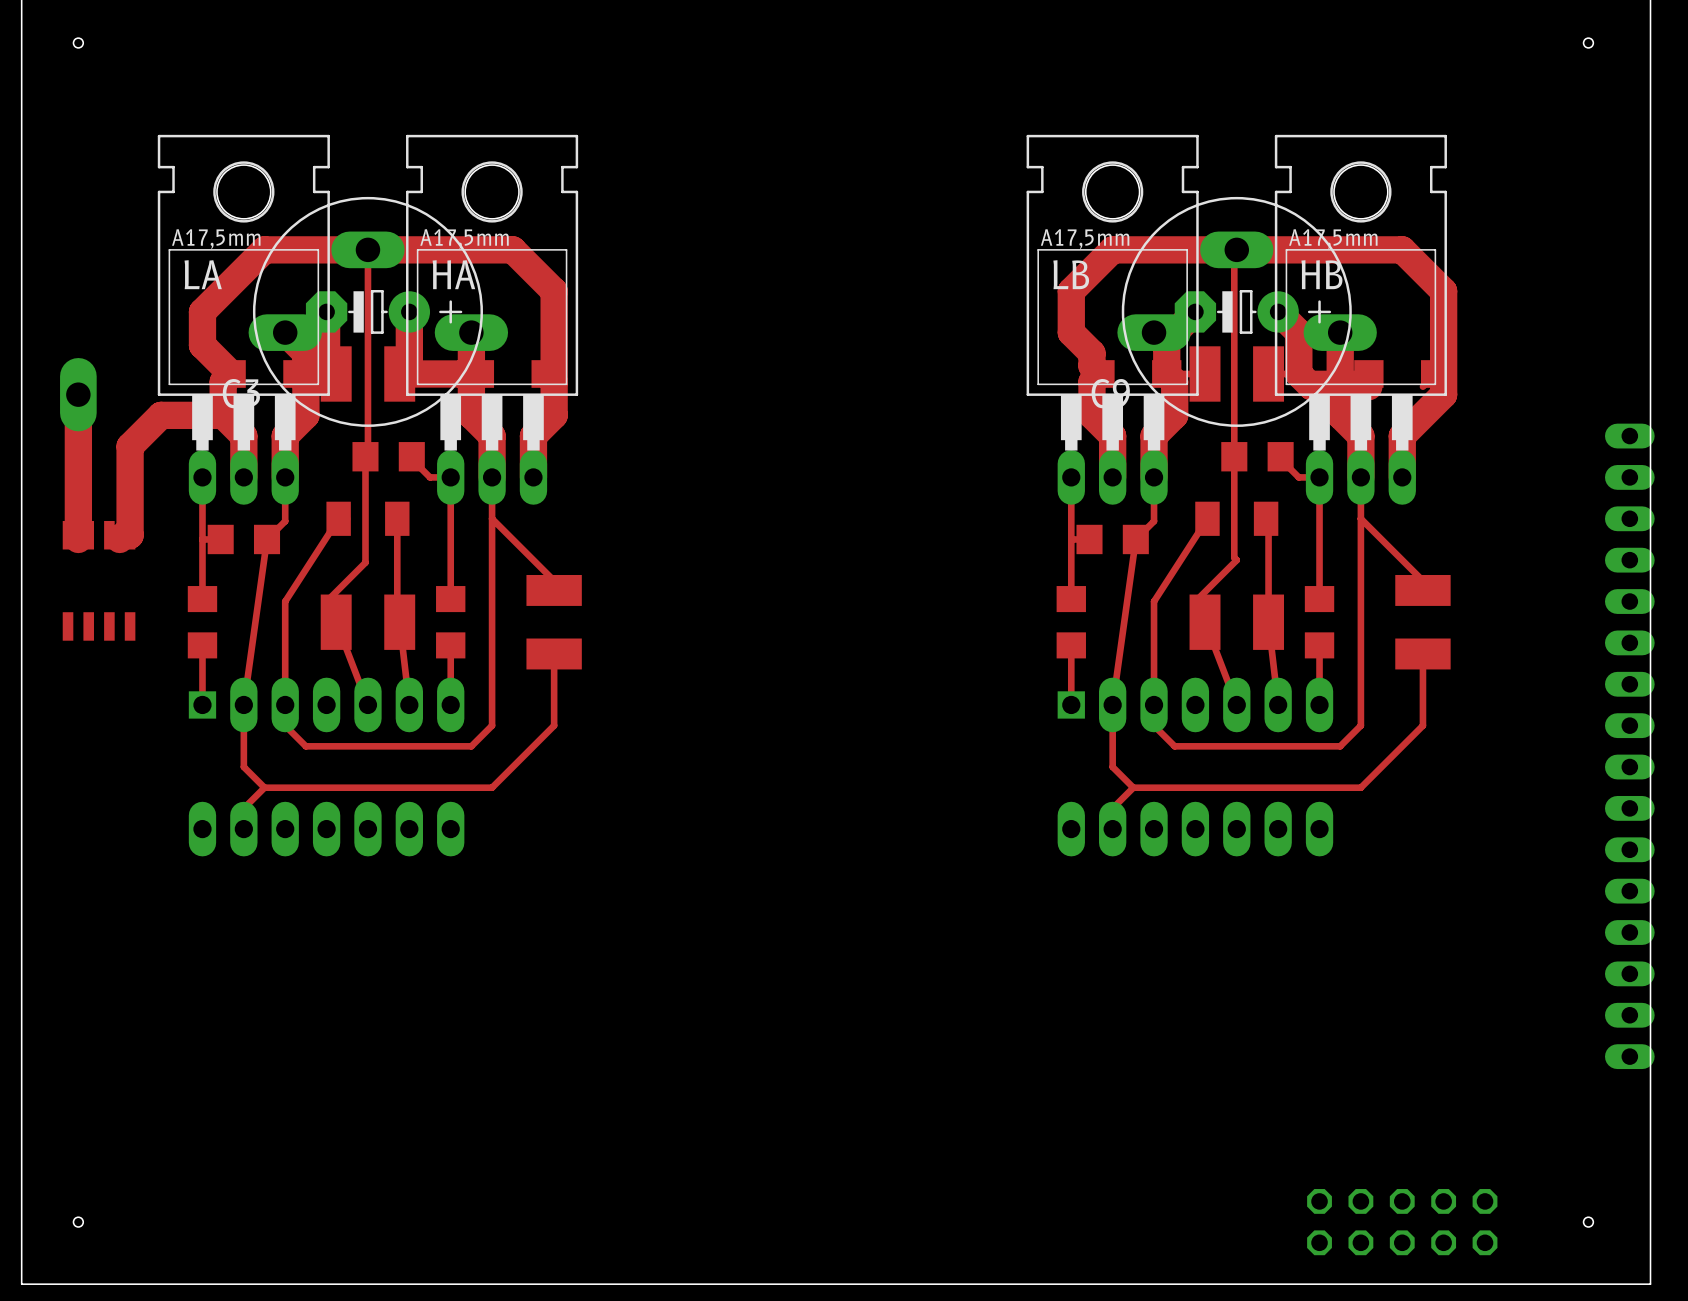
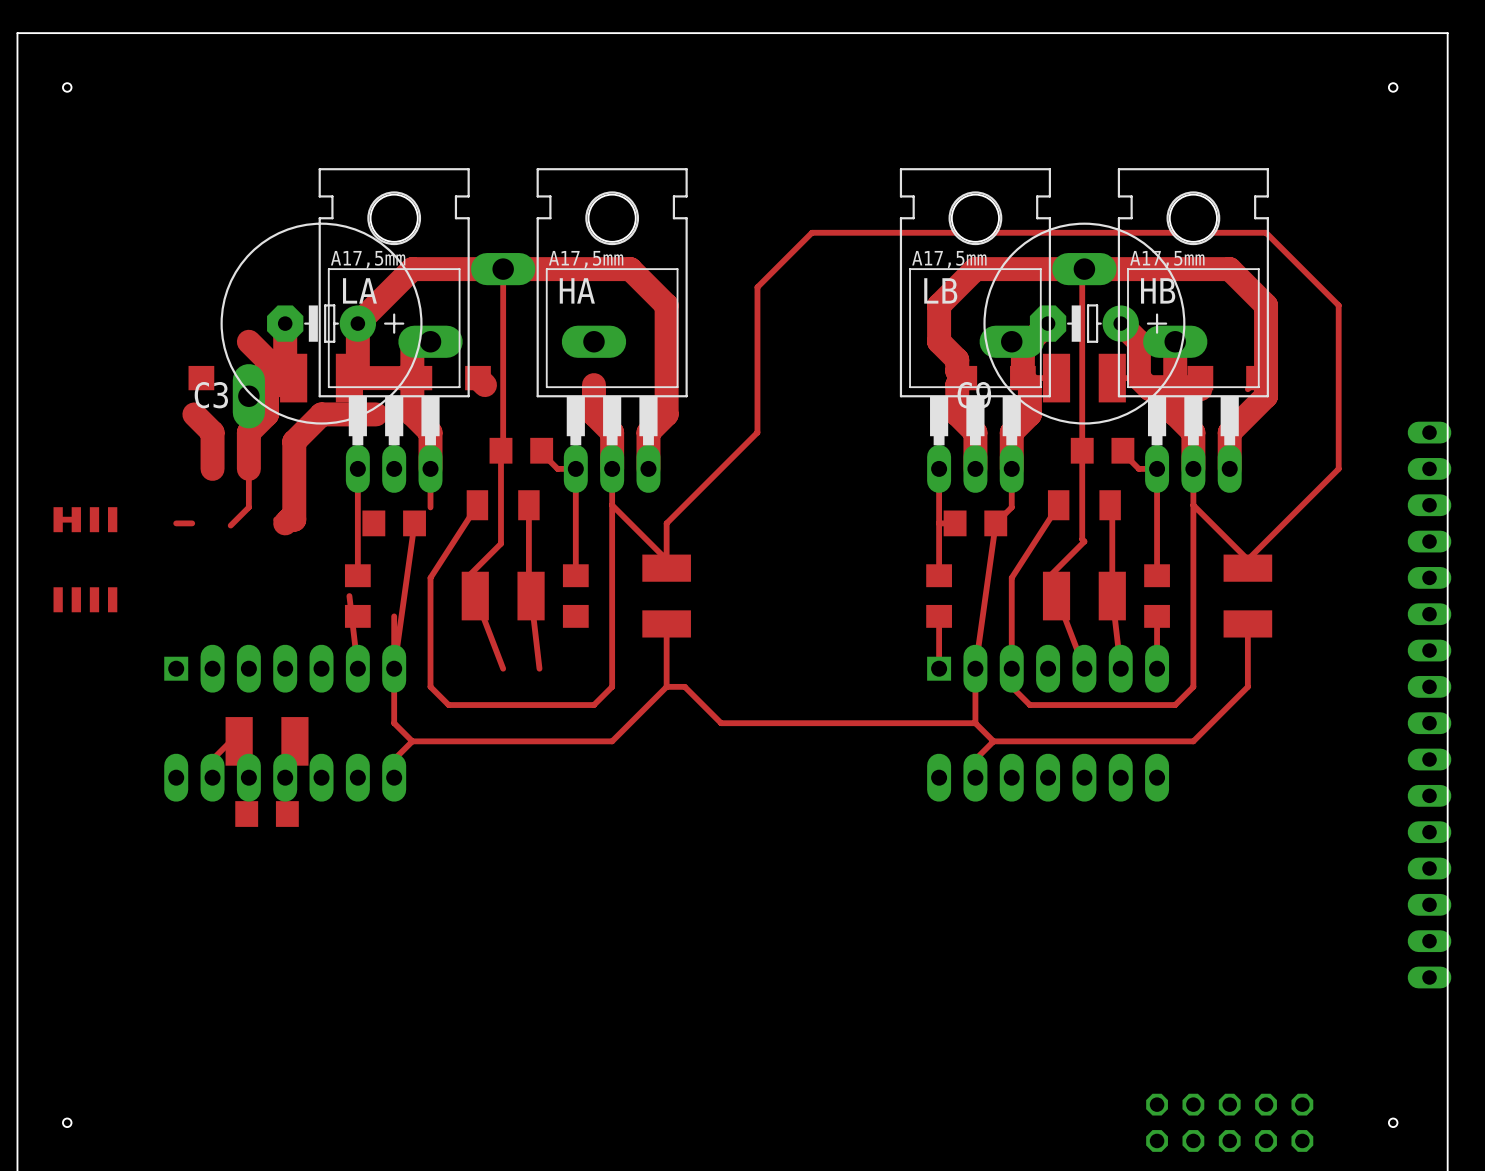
top track: (367, 249) (367, 454) (365, 456) (365, 562) (326, 601) (326, 612) (336, 622) (367, 704) -> (503, 269) (500, 543) (466, 577) (466, 587) (475, 596) (503, 668)
part: (367, 249) -> none
top track: (471, 249) (264, 249) (202, 311) (202, 345) (231, 373) (223, 381) (223, 415) (161, 415) (130, 446) (130, 535) (123, 535) (119, 539) (113, 539) (109, 535) -> (412, 269) (357, 323)
top track: (512, 249) (554, 291) (554, 415) (533, 436) (533, 477) -> (448, 269) (630, 269) (666, 305) (666, 414) (648, 432) (648, 468)
part: none -> (503, 269)
LA position: (243, 319) -> (394, 330)
HA position: (492, 319) -> (612, 330)
part rotation: 0° (285, 332) -> 90° clockwise (248, 396)
part position: (285, 332) -> (248, 396)
part position: (471, 332) -> (430, 341)
part: none -> (593, 341)
top track: (78, 394) (78, 539) (74, 535) -> none
part: (78, 394) -> none
top track: none -> (376, 414) (321, 414) (294, 441) (294, 519) (288, 519) (285, 523) (279, 523) (276, 519)
part: (388, 456) -> none
top track: (411, 456) (411, 459) (430, 477) (450, 477) (450, 599) -> (541, 450) (557, 468) (575, 468) (575, 575)
part: none -> (521, 450)
top track: (202, 477) (202, 599) -> (357, 468) (357, 575)
top track: (347, 518) (338, 518) (285, 601) (285, 725) (305, 746) (471, 746) (492, 725) -> (593, 385) (593, 414) (612, 432) (612, 686) (593, 705) (448, 705) (430, 686)
part position: (367, 518) -> (503, 505)
top track: (397, 518) (397, 619) (399, 622) (388, 633) (388, 642) -> none
top track: (492, 518) (554, 580) (554, 590) -> none
top track: none -> (528, 505) (528, 593) (531, 596)
top track: none -> (612, 505) (666, 559)
top track: (492, 521) (492, 601) -> (485, 505) (477, 505) (430, 577)
part: (243, 539) -> none
top track: (267, 539) (243, 704) (243, 767) (264, 787) (471, 787) -> none
part: none -> (394, 523)
top track: none -> (414, 523) (394, 668) (394, 723) (412, 741) (394, 759) (394, 777)
top track: none -> (1247, 559) (1338, 468) (1338, 305) (1266, 232) (811, 232) (757, 287) (757, 432) (666, 523) (666, 568)
part: (202, 622) -> none
part: (367, 622) -> none
part: none -> (357, 596)
part: (450, 622) -> none
part rotation: 0° (554, 622) -> 90° clockwise (503, 596)
top track: none -> (531, 596) (539, 668)
part: none -> (575, 596)
part: none -> (666, 596)
top track: (554, 642) (554, 725) (492, 787) -> (666, 686) (612, 741) (430, 741)
top track: none -> (666, 614) (666, 686)
top track: (202, 645) (202, 704) -> none
top track: none -> (666, 686) (684, 686) (721, 723) (975, 723)
part: none -> (267, 741)
part: none -> (267, 814)

